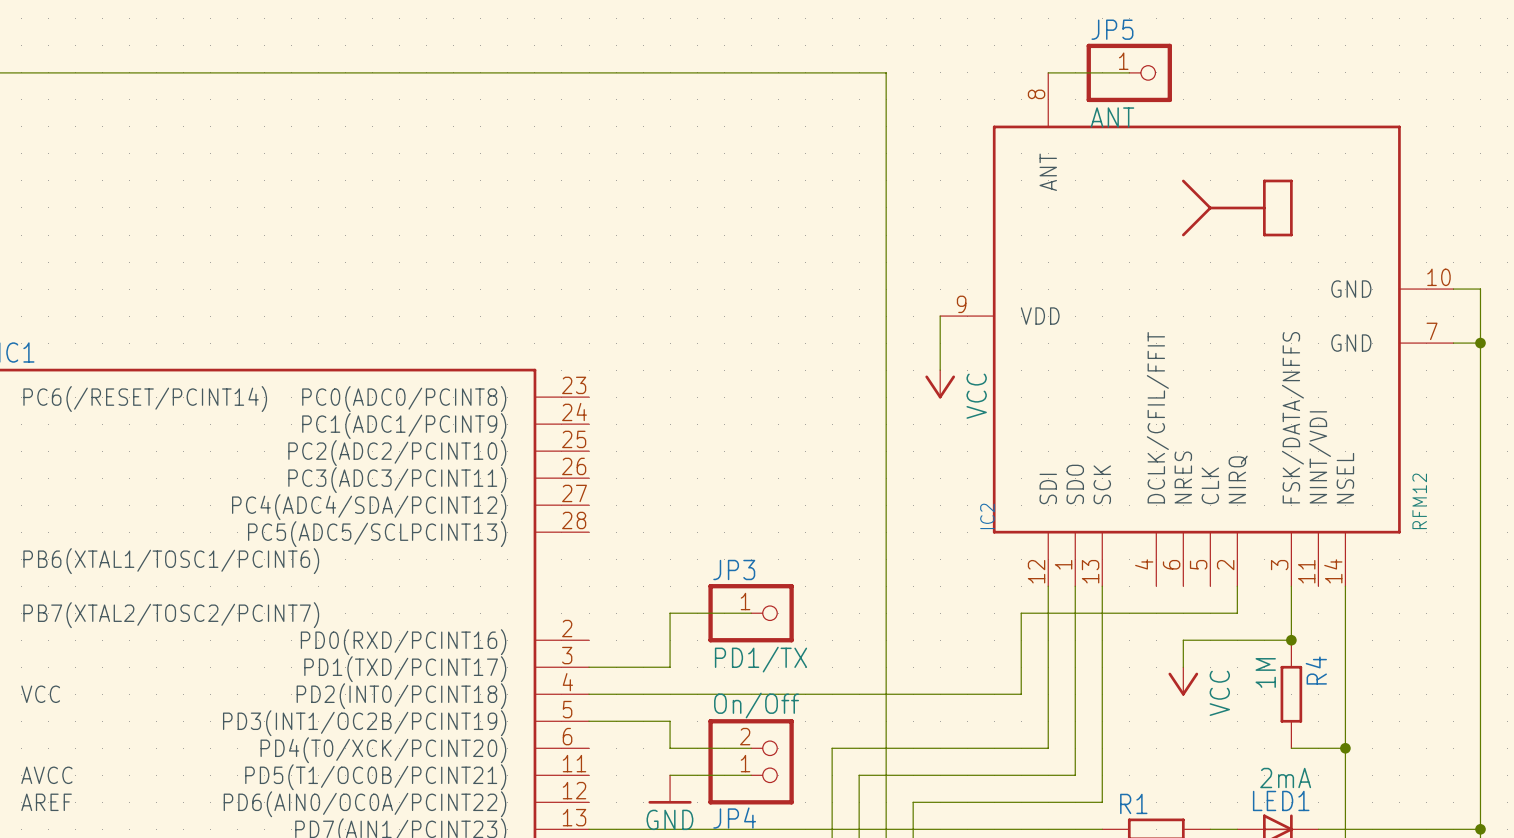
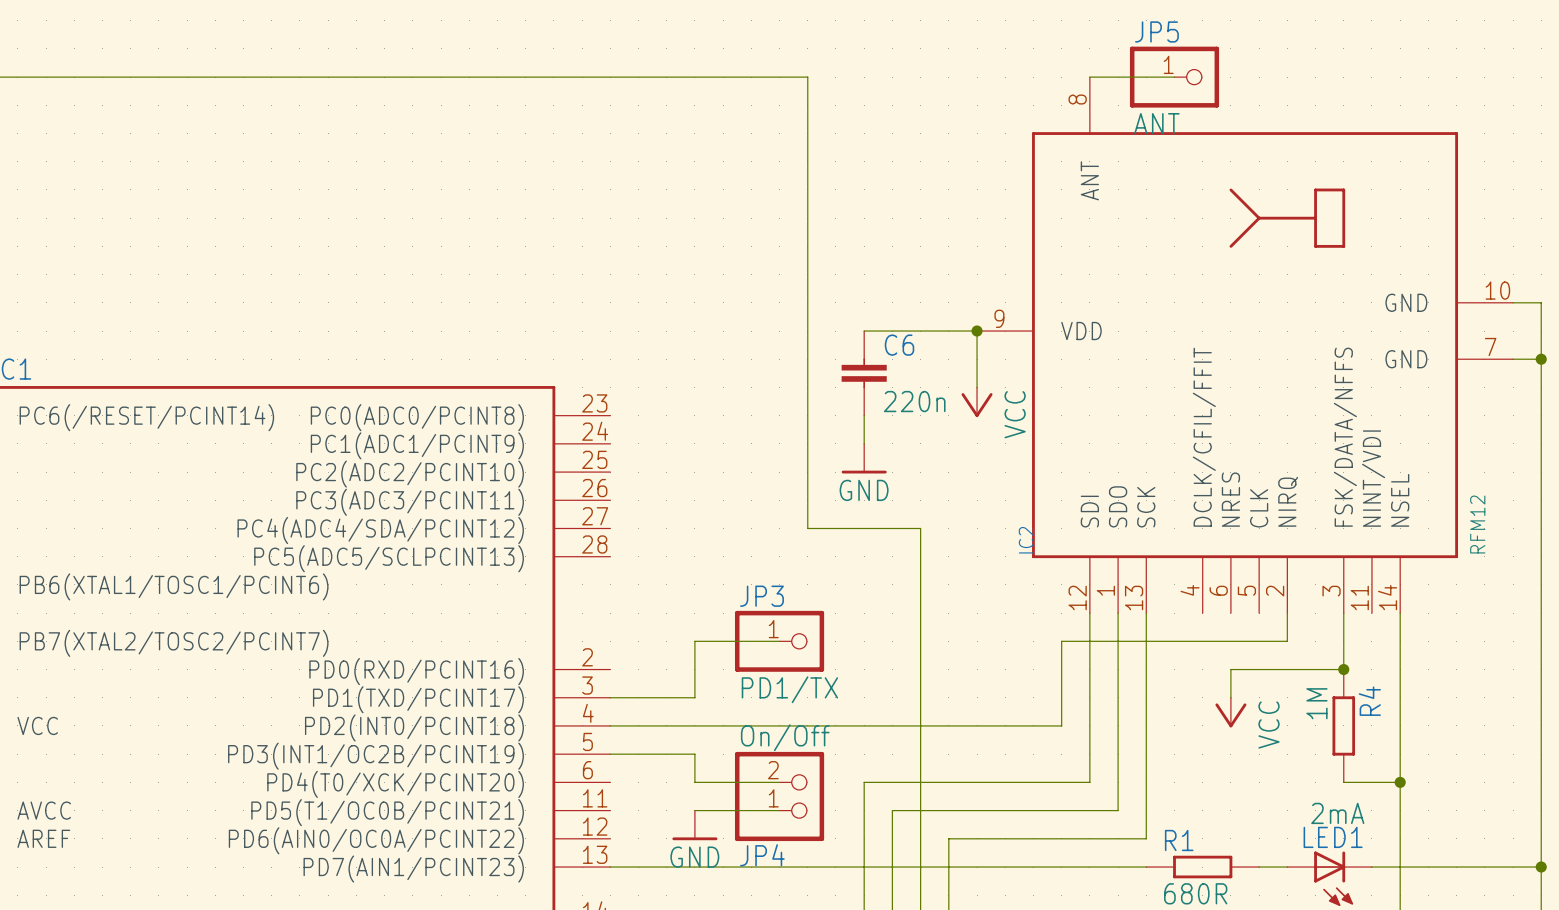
wire: (778, 72) (886, 72) (886, 505) -> (807, 77) (807, 528) (920, 528)
wire: none -> (864, 331) (977, 331)
junction: none -> (977, 331)
C6: none -> 220n (864, 373)
wire: none -> (864, 415) (864, 443)
power symbol: none -> GND (864, 458)

